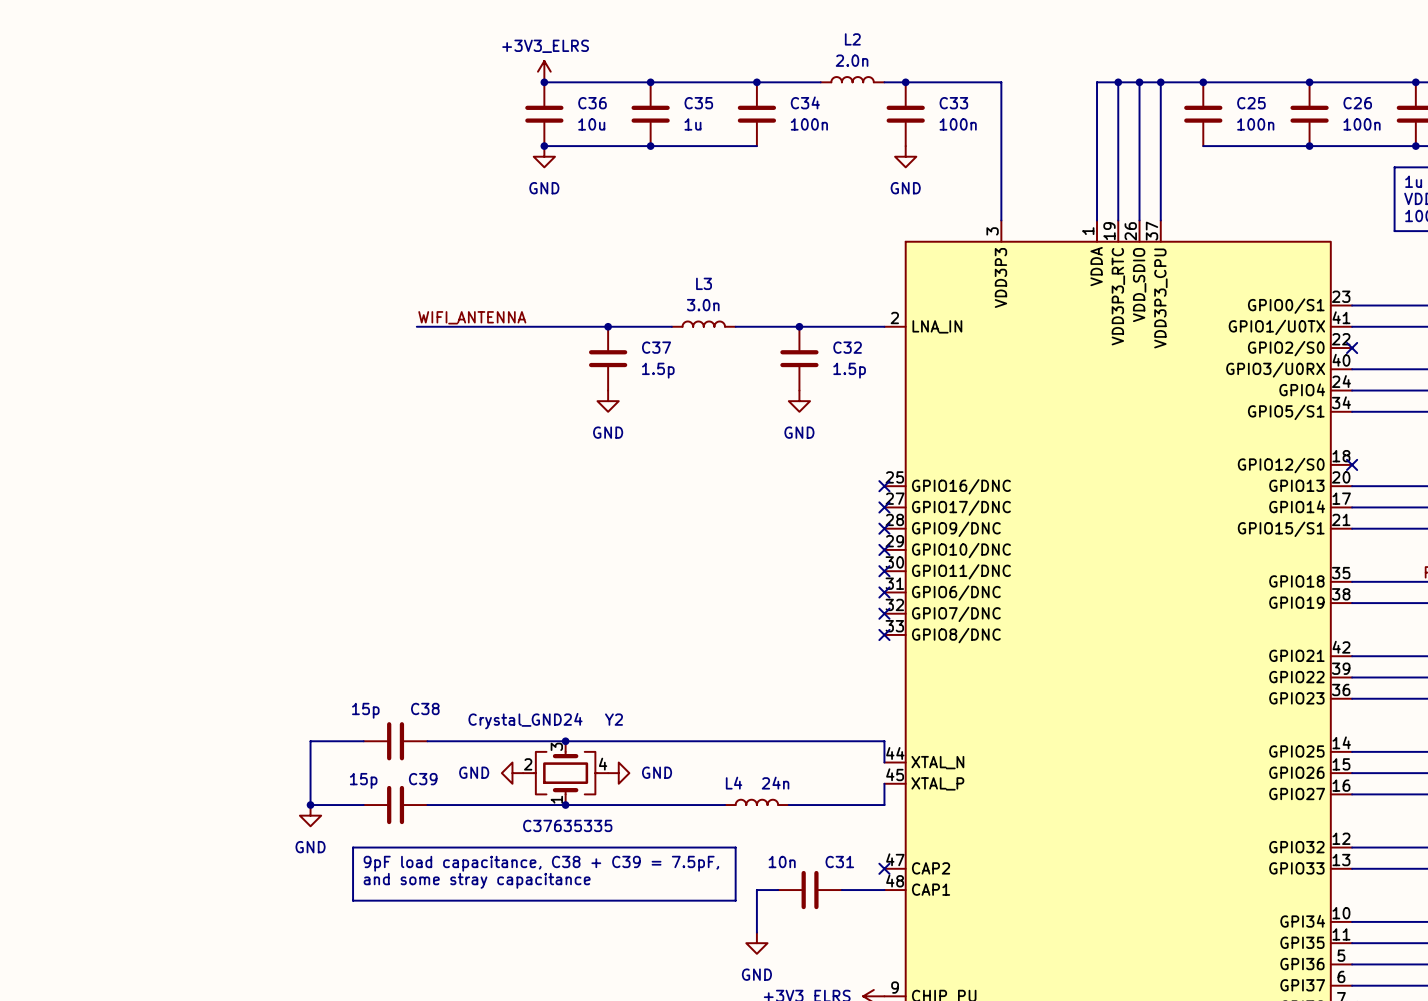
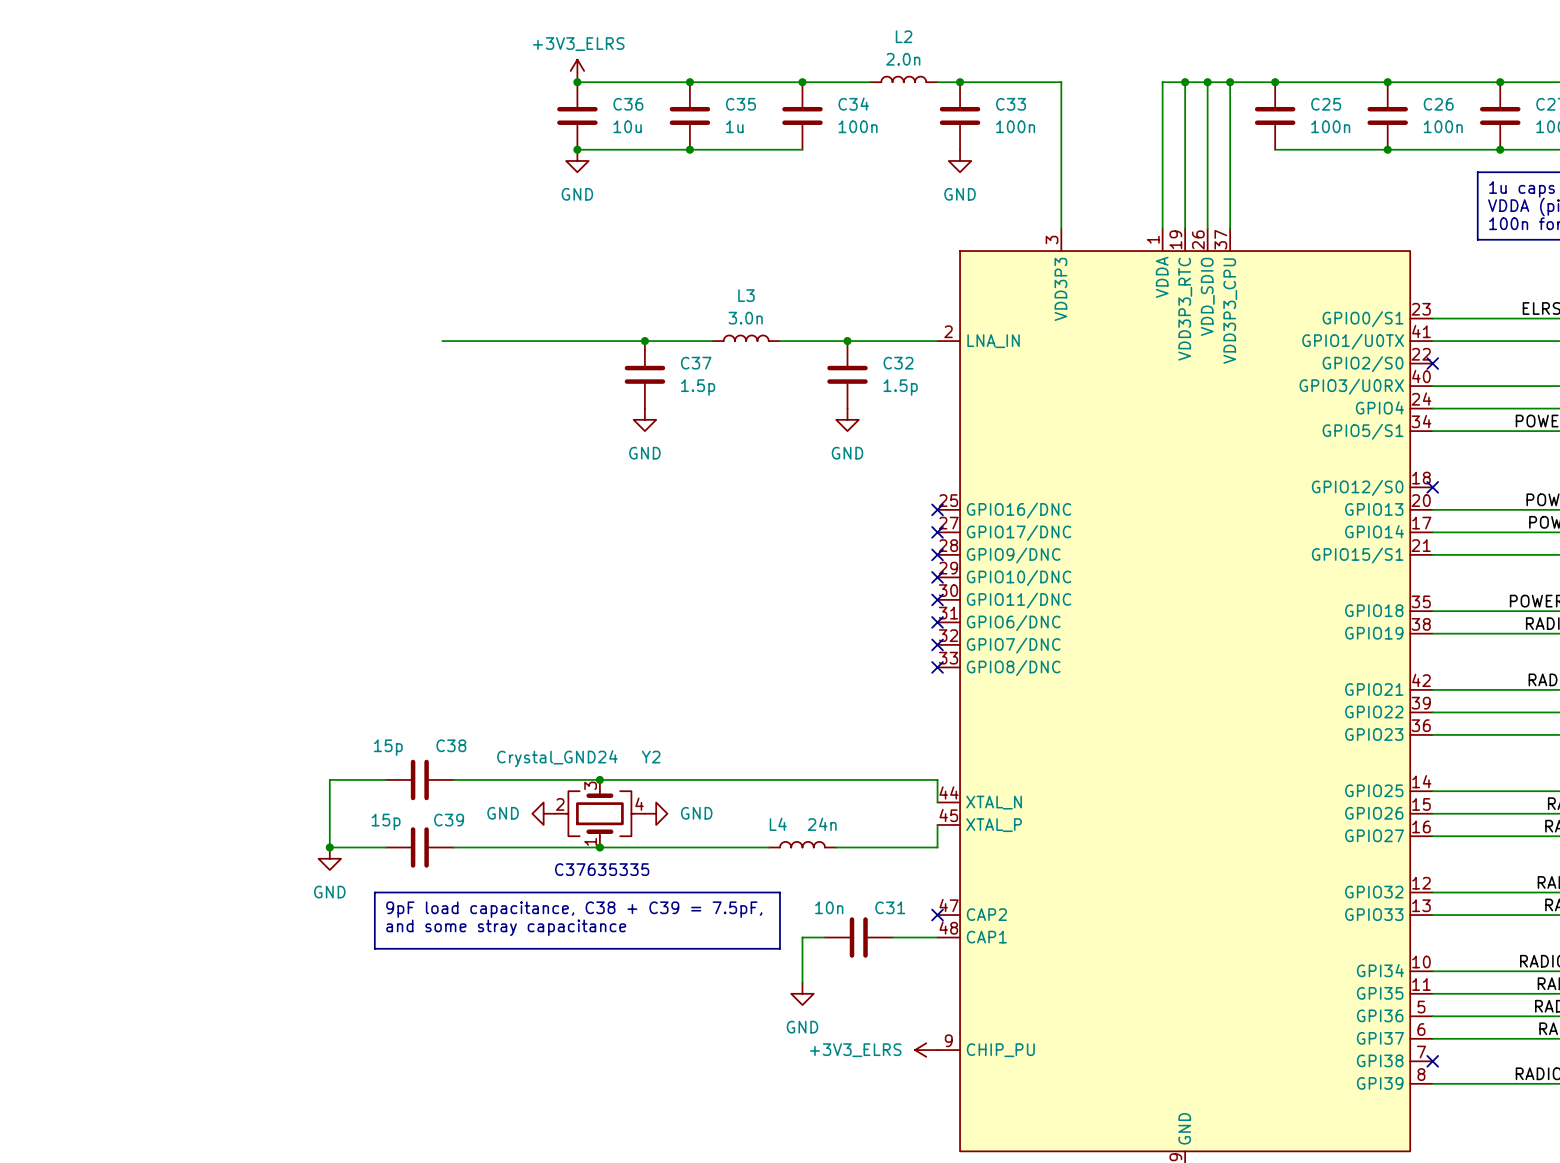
label: WIFI_ANTENNA (472, 317) -> none

